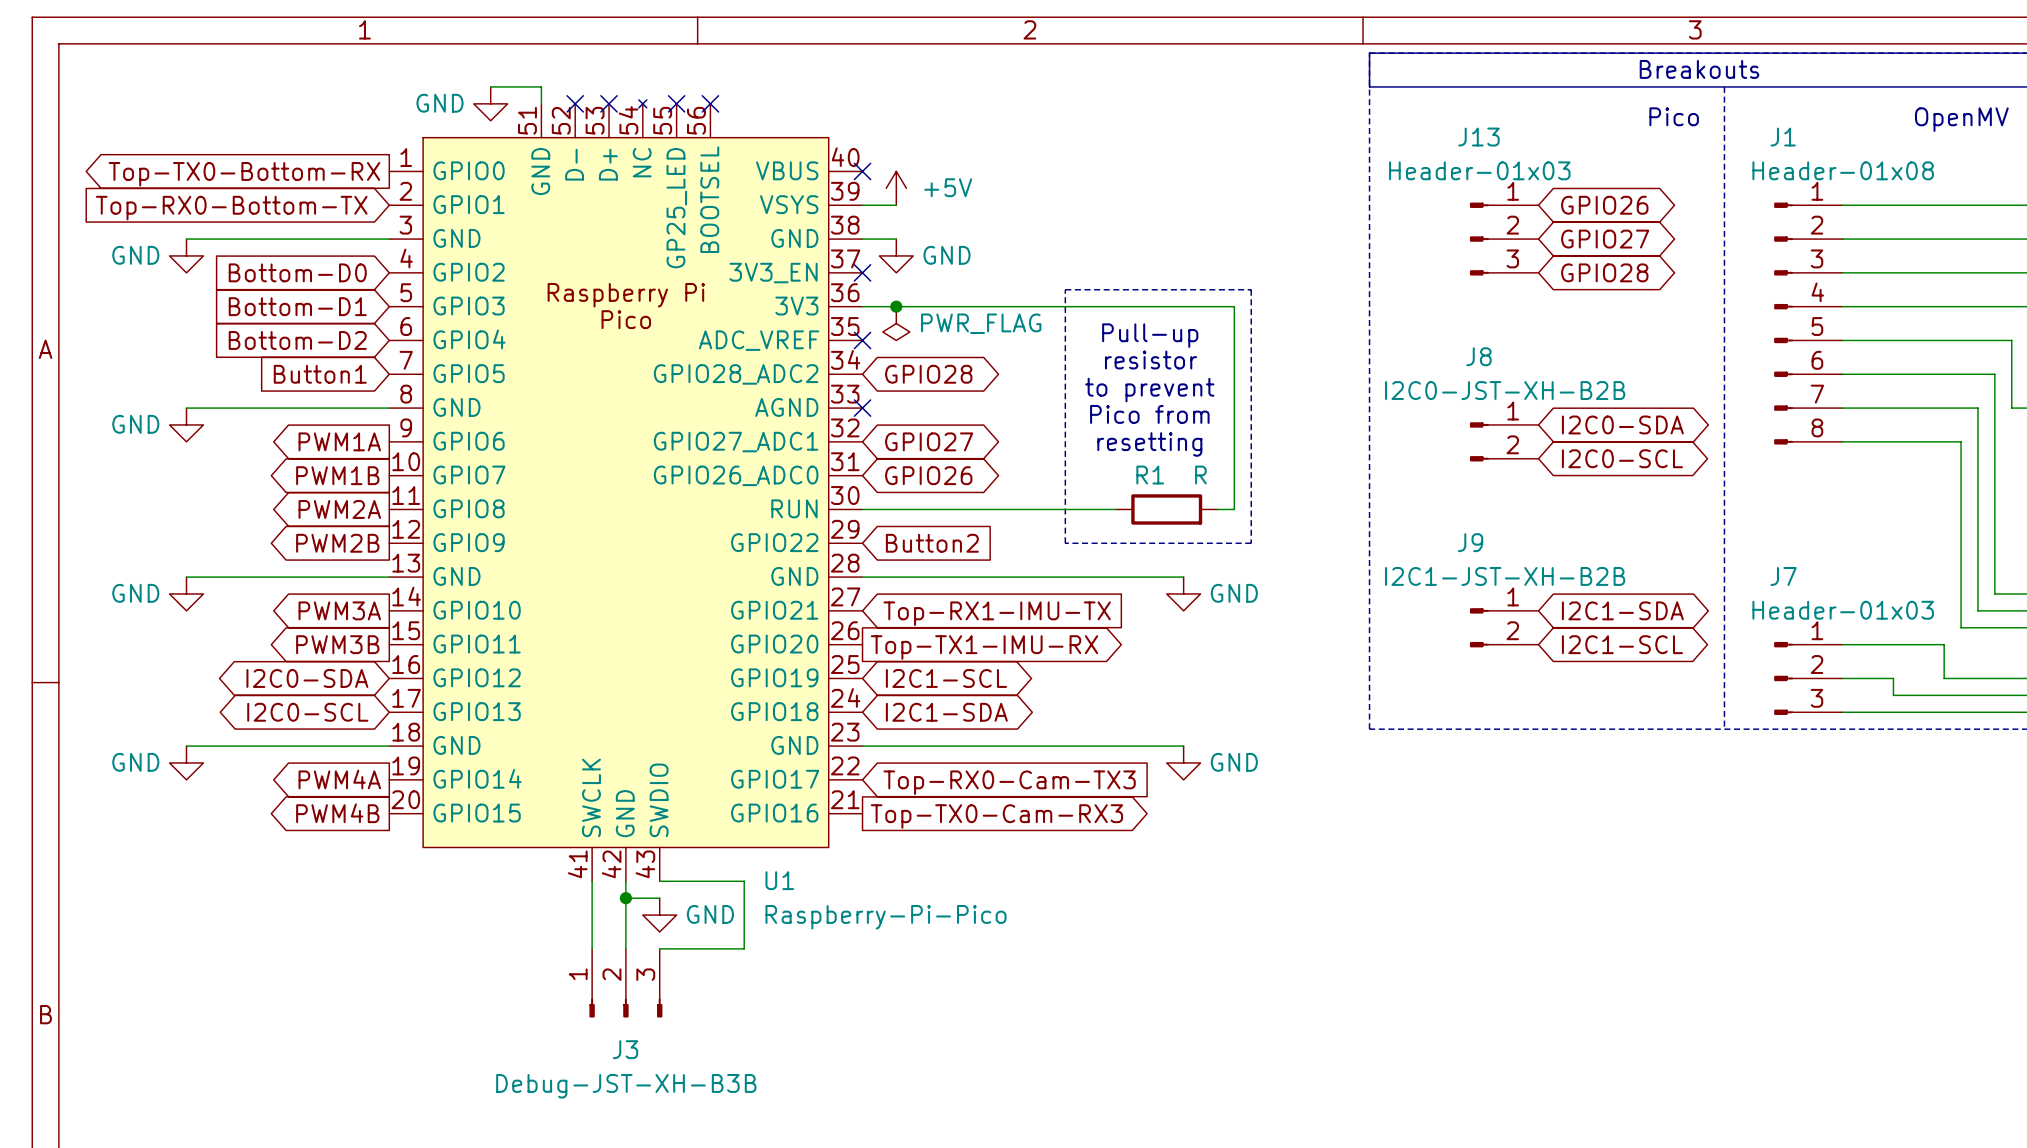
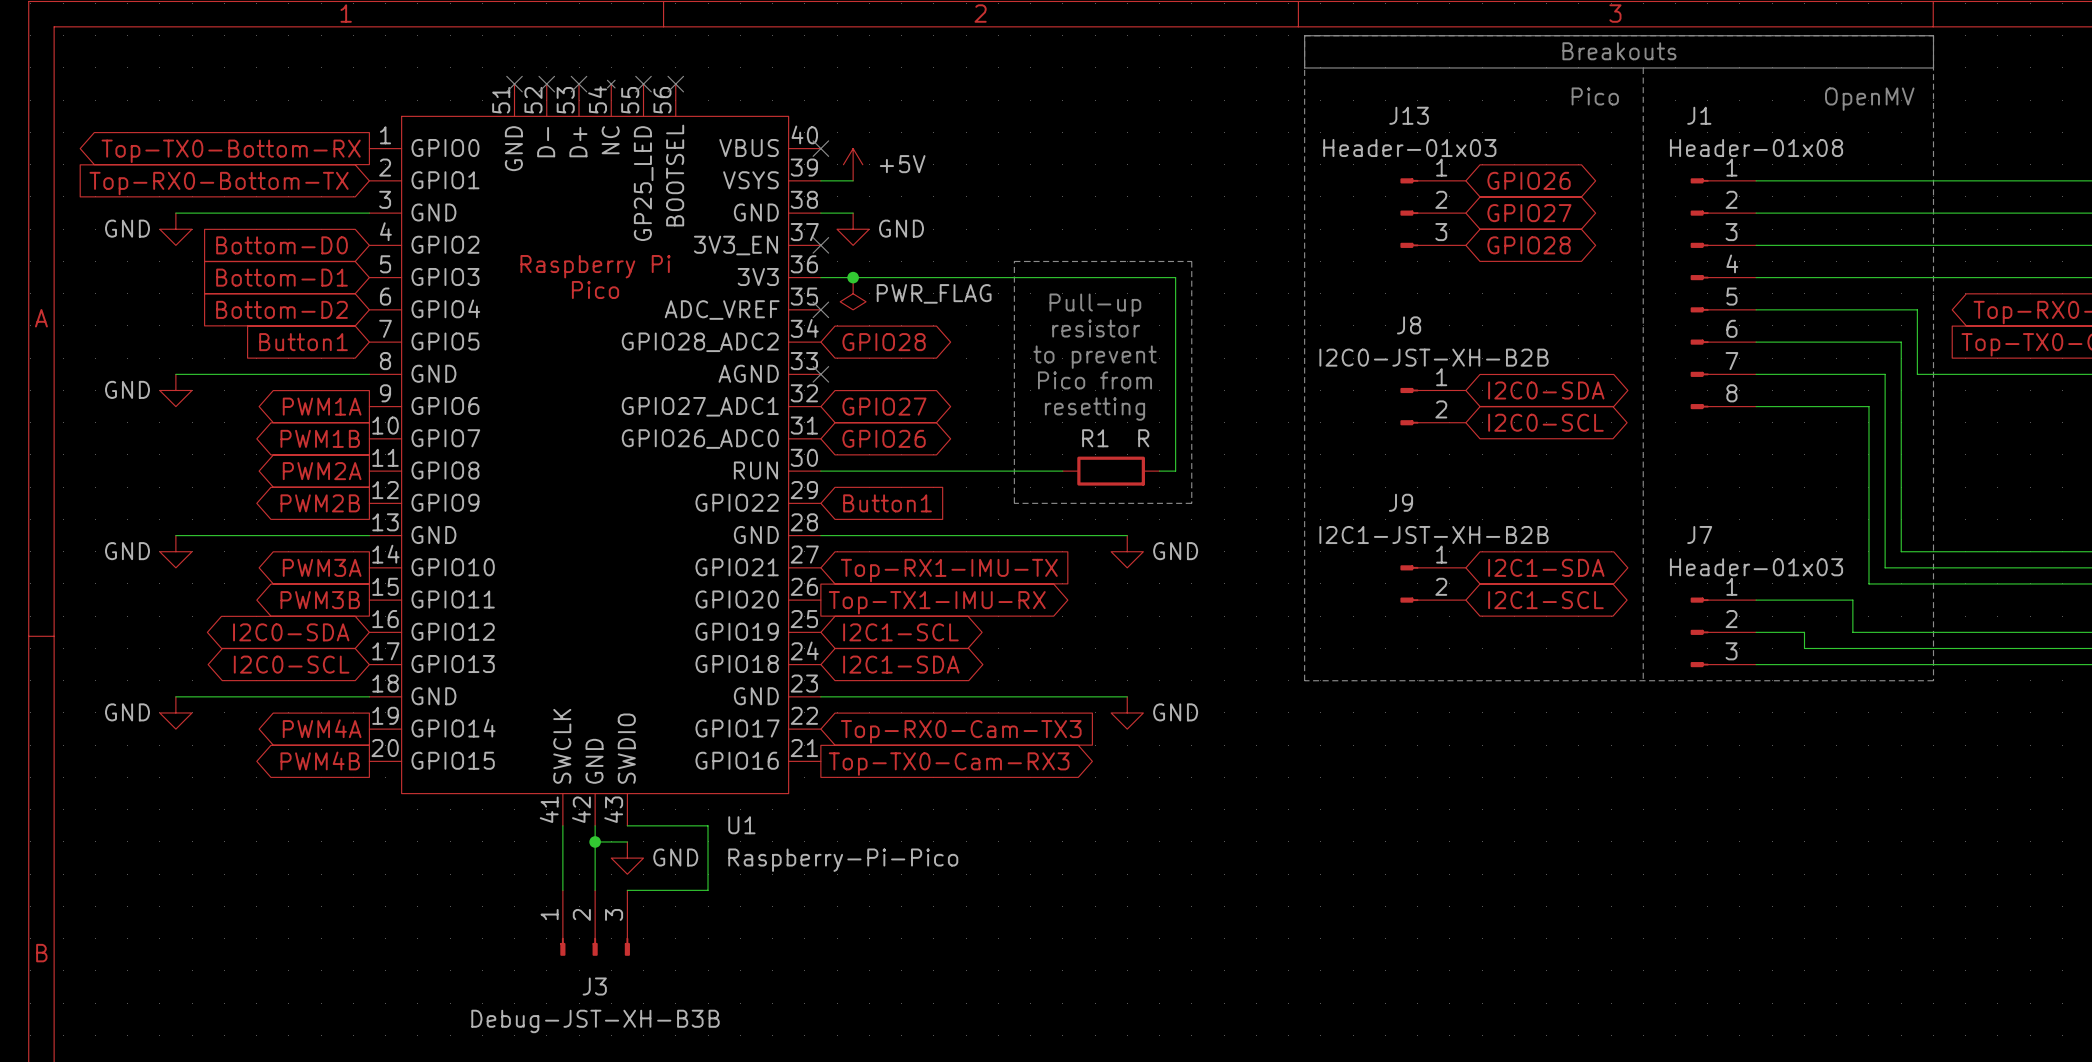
wire: (490, 86) (541, 86) (541, 103) -> none
power symbol: GND (490, 103) -> none
no-connect mark: none -> (514, 84)
global label: Button2 (932, 543) -> Button1 (887, 503)

